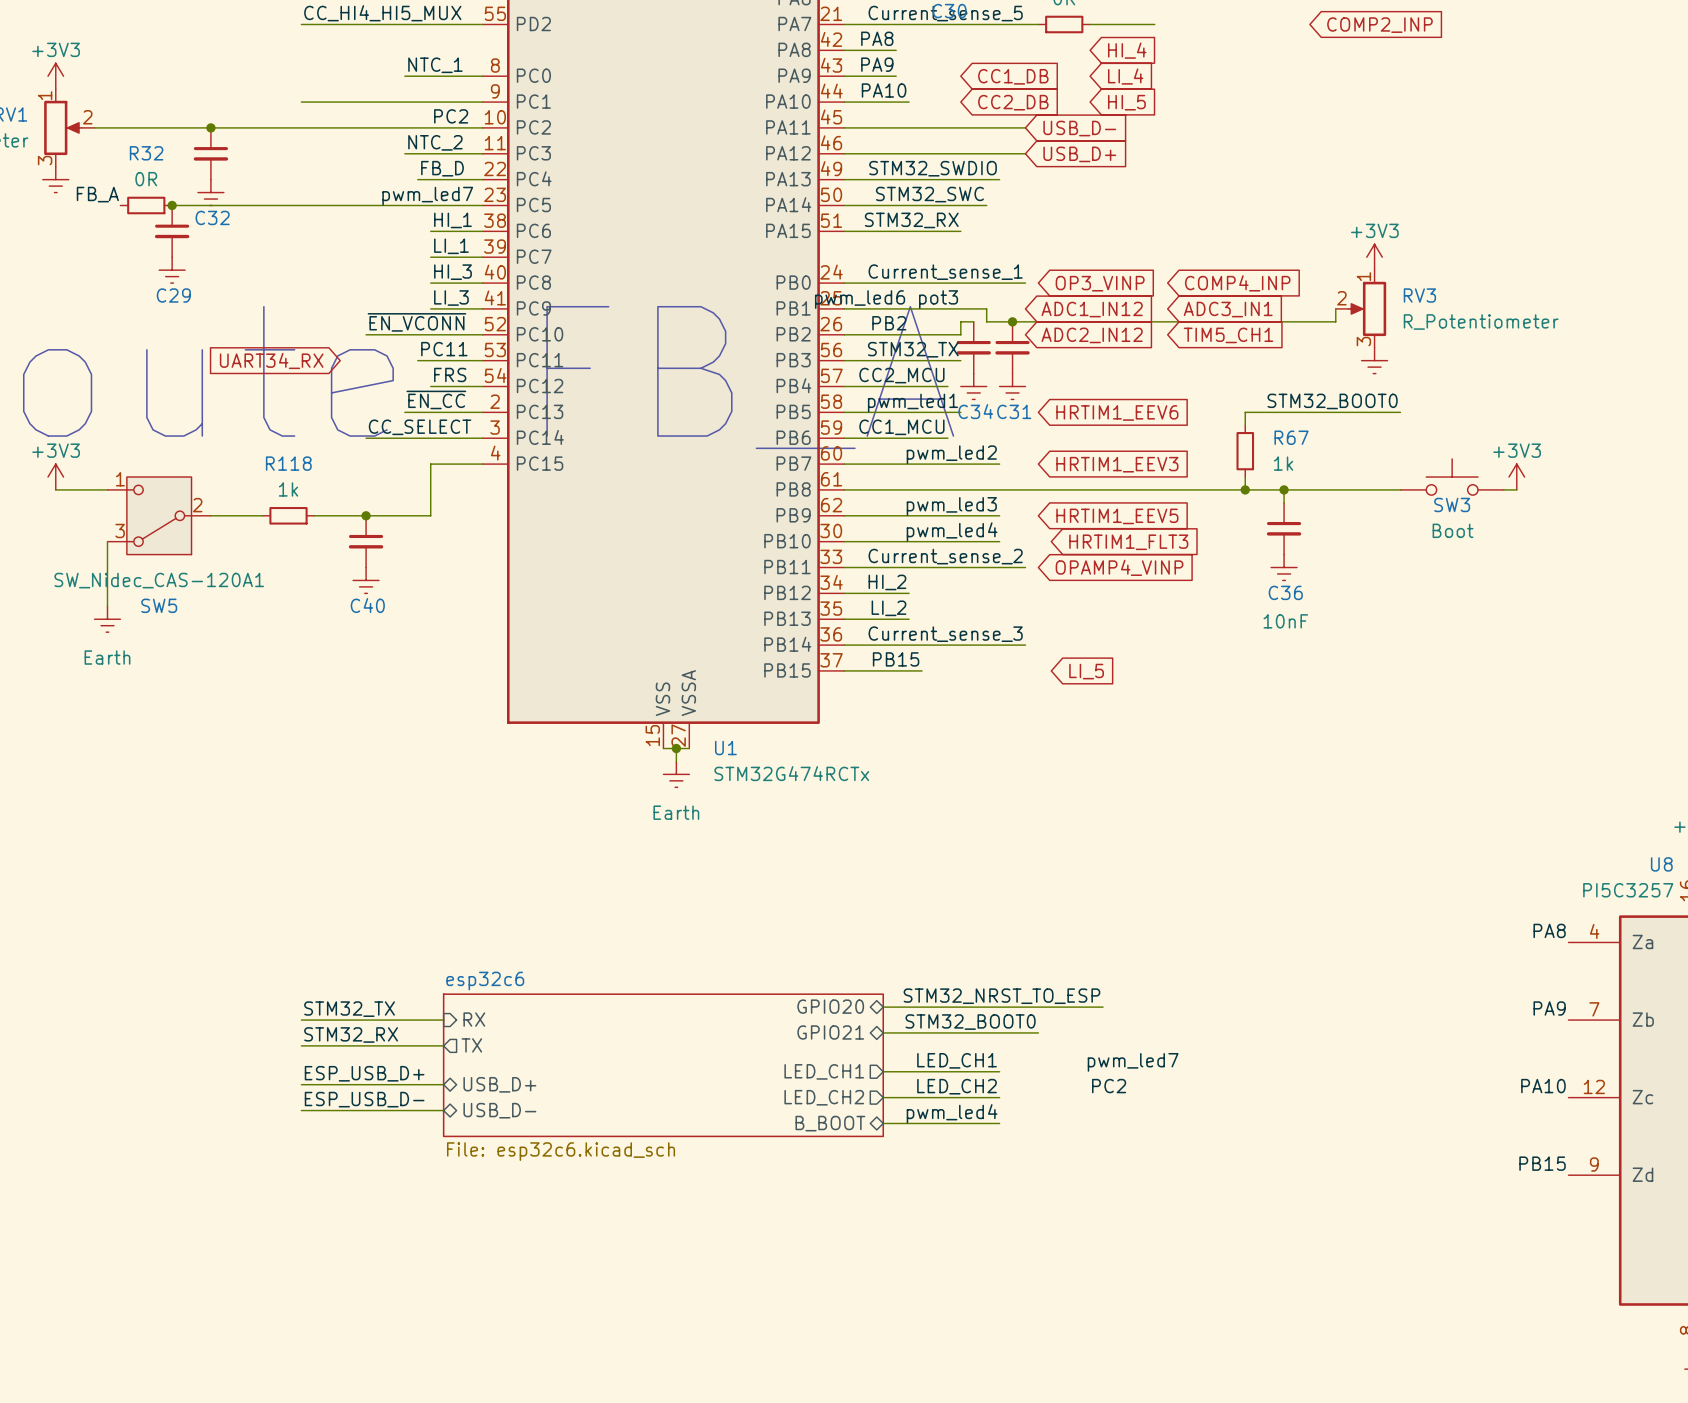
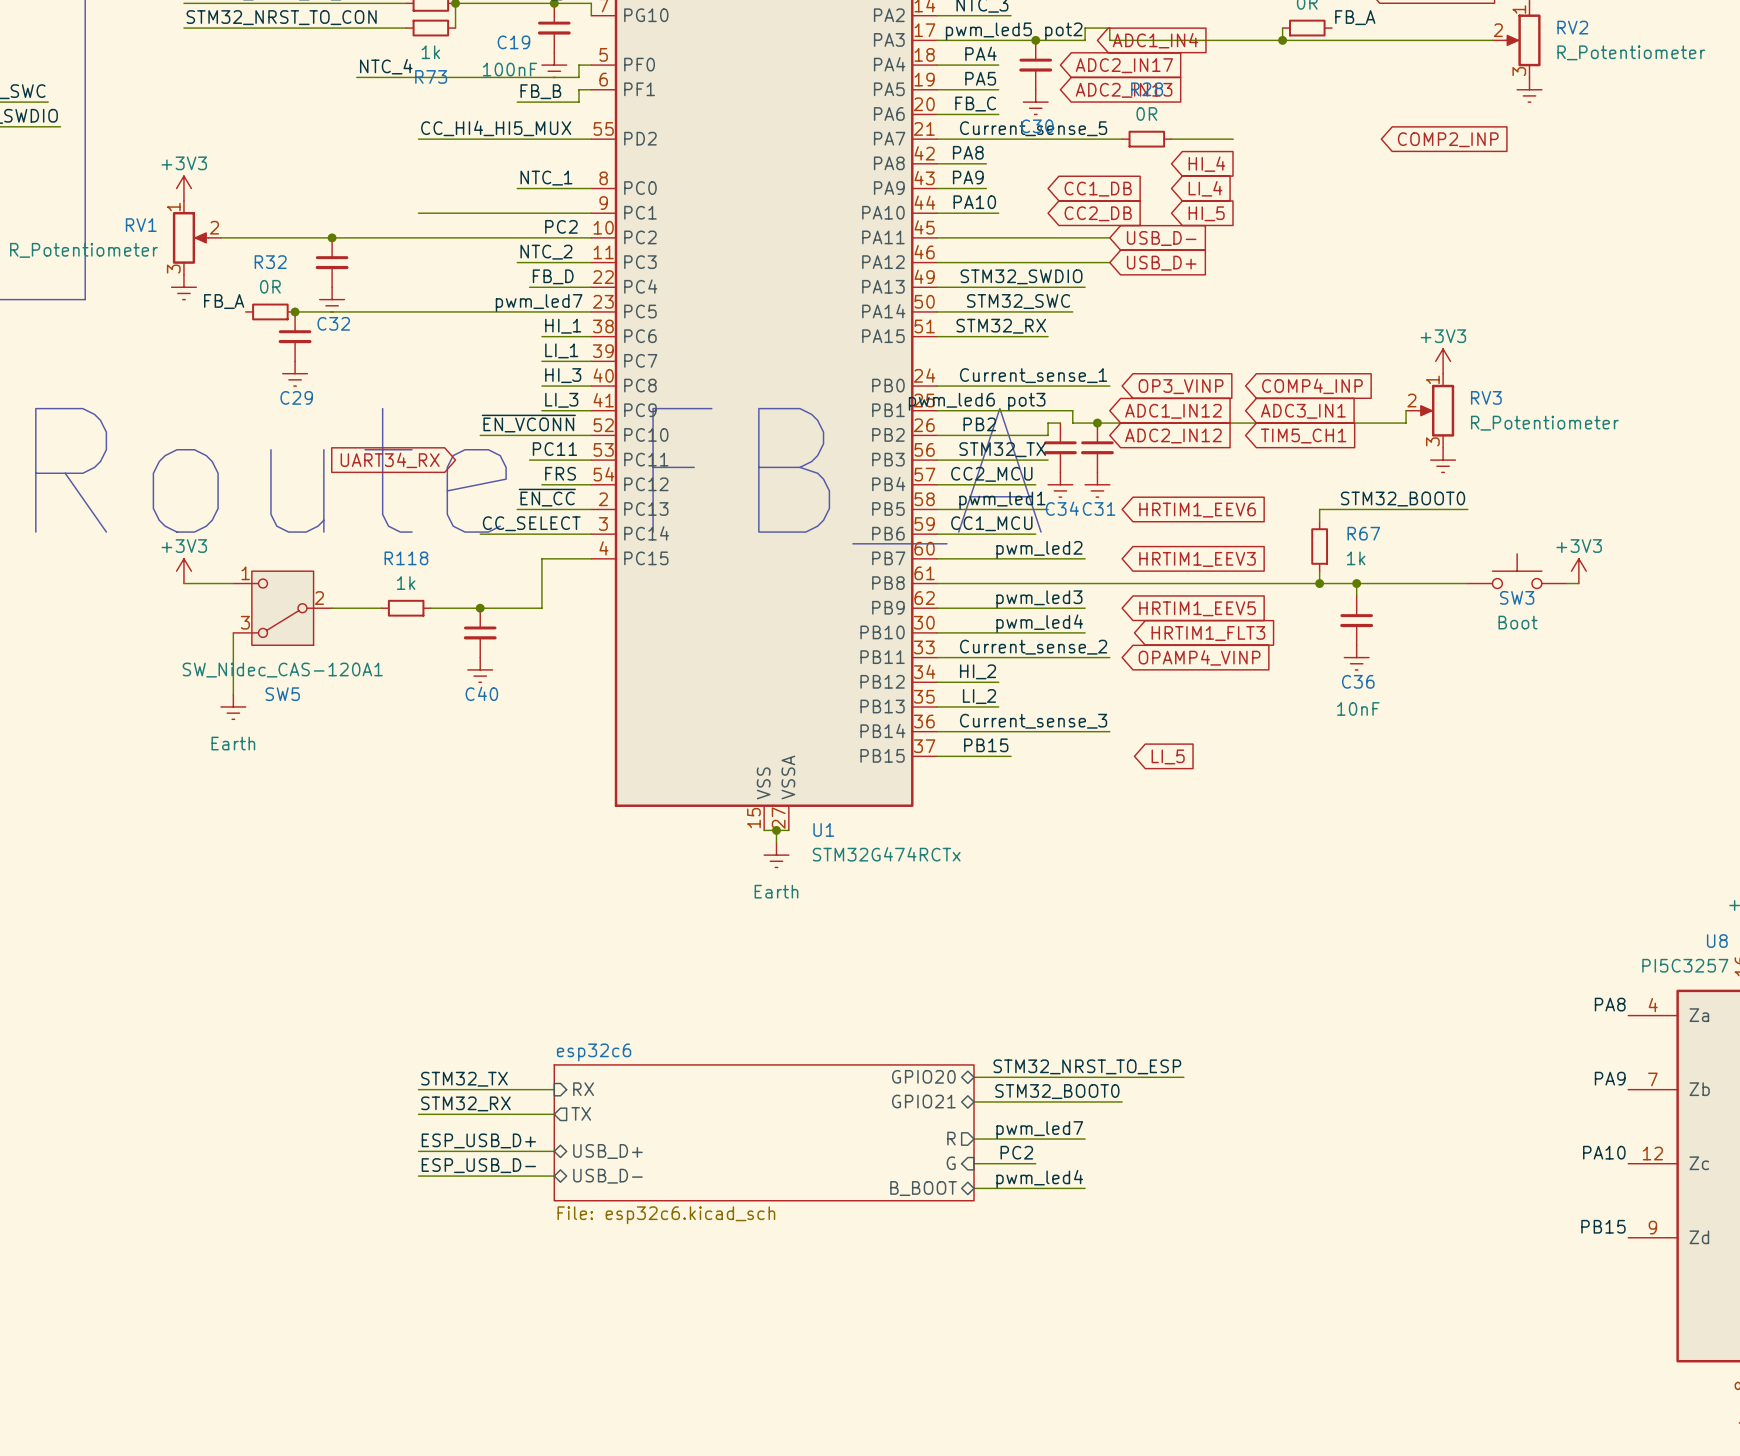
label: LED_CH1 (957, 1060) -> pwm_led7 (1039, 1130)
label: pwm_led7 (1133, 1062) -> none
sheet pin: LED_CH1 (824, 1071) -> R (951, 1138)
label: LED_CH2 (957, 1086) -> none
label position: PC2 (1109, 1086) -> PC2 (1016, 1152)
sheet pin shape: output (824, 1097) -> input (951, 1163)
sheet pin: LED_CH2 (824, 1097) -> G (951, 1163)
wire: (947, 1097) (999, 1097) -> none

